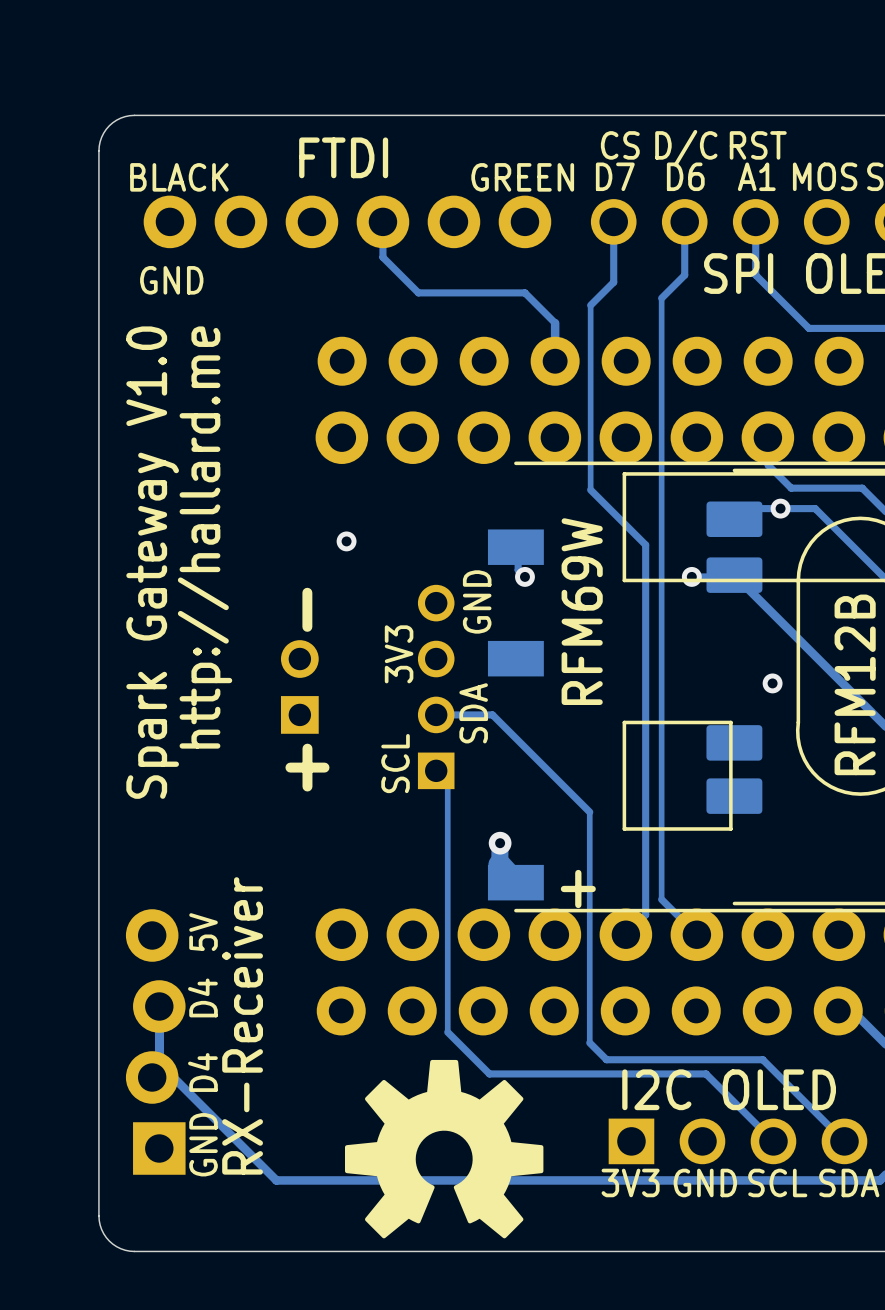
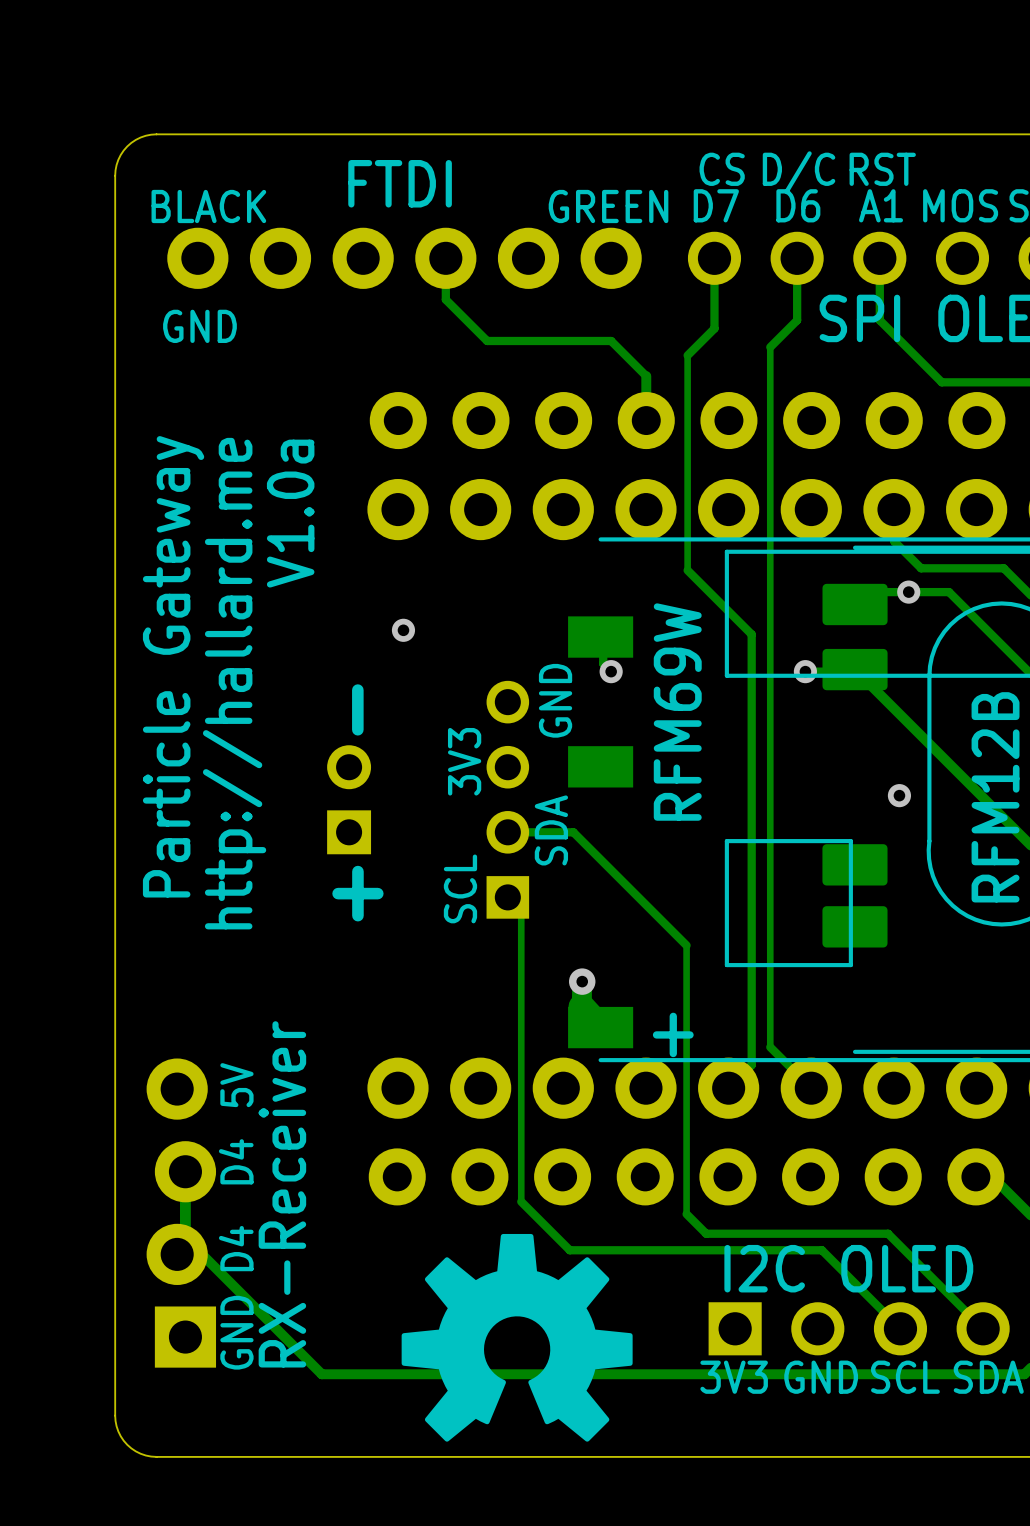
text: none -> V1.0a (290, 513)
text position: http://hallard.me (205, 537) -> http://hallard.me (234, 683)
text: Spark Gateway V1.0 (152, 562) -> none
text: none -> Particle Gateway (173, 666)

